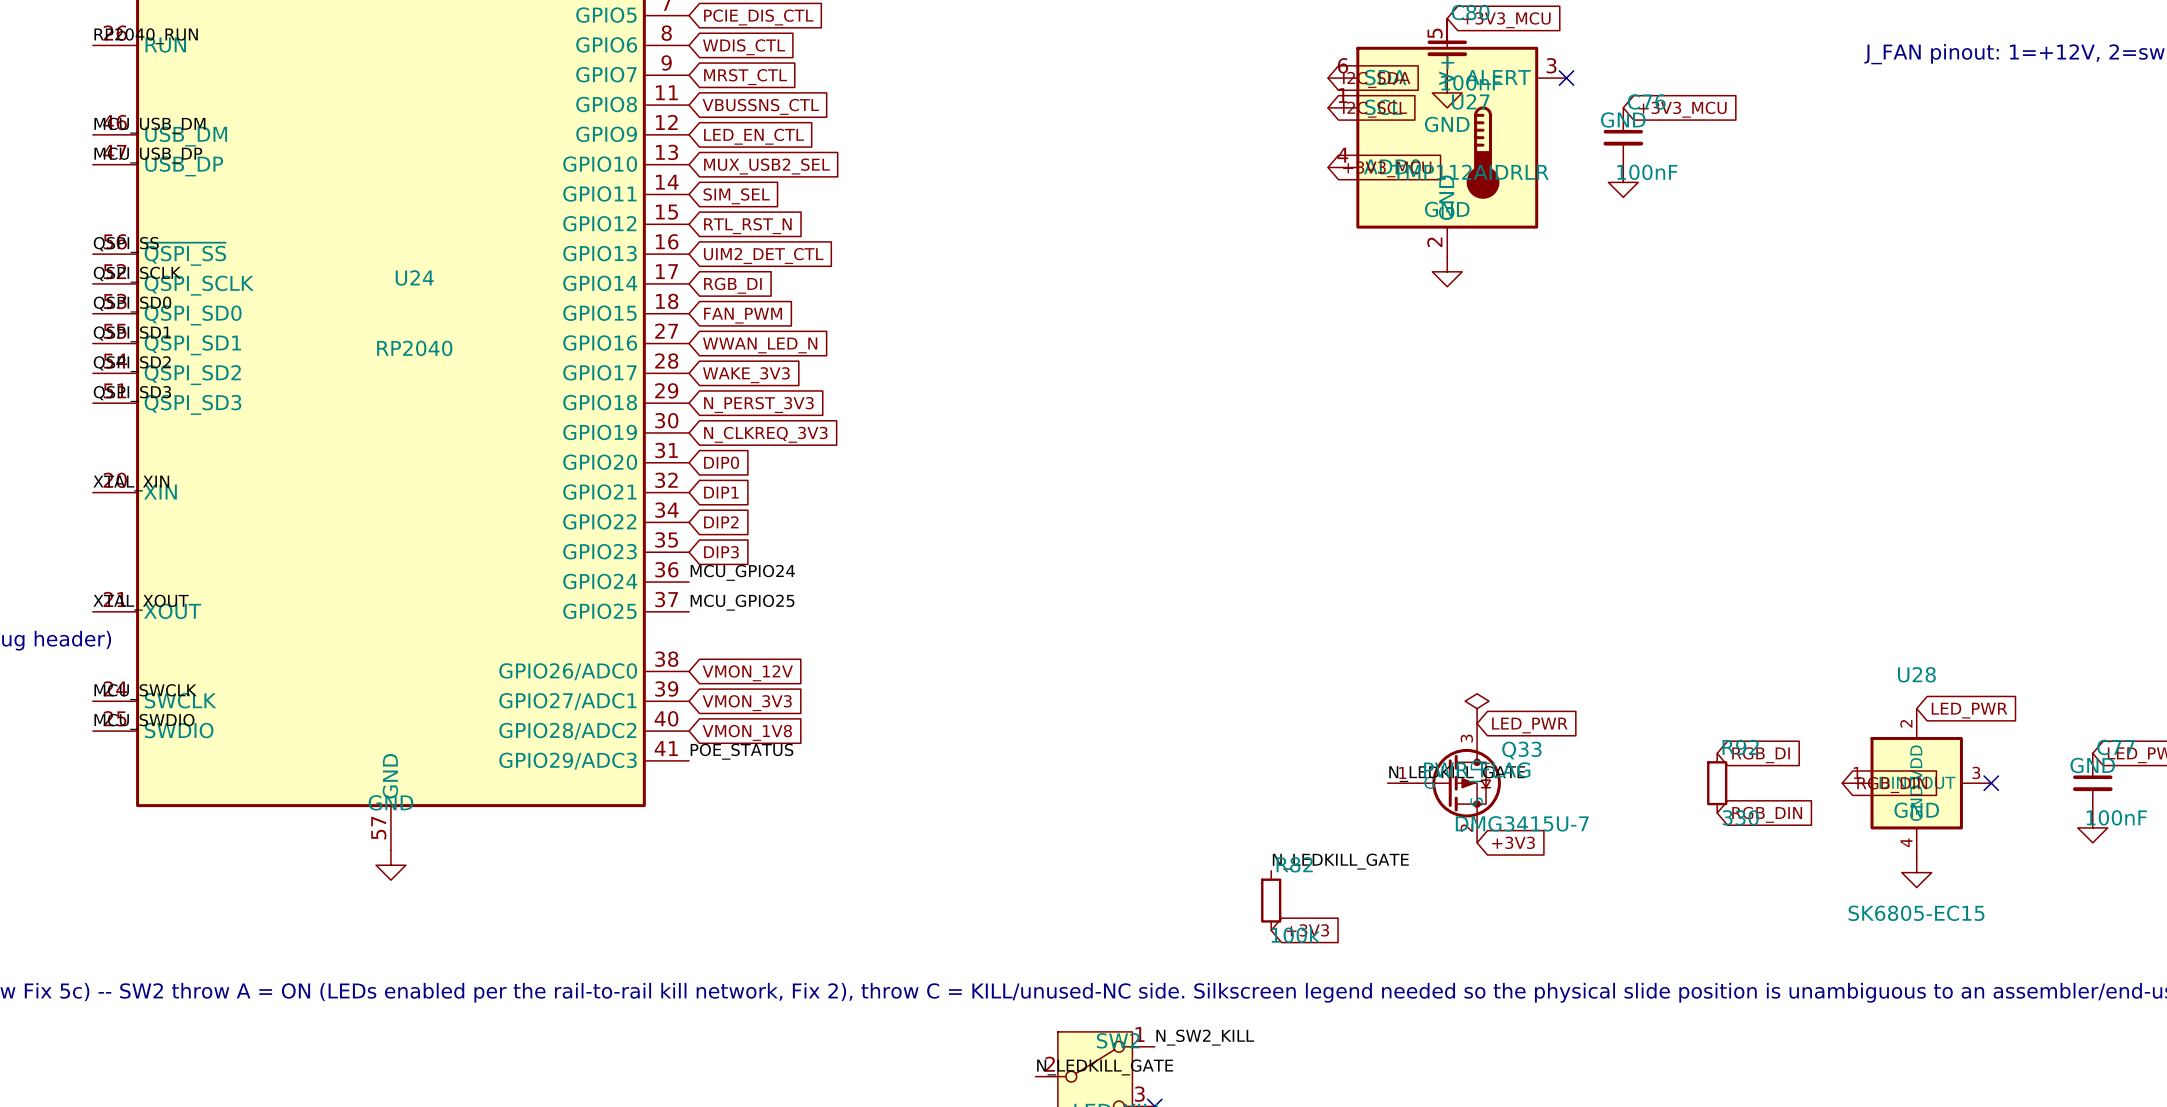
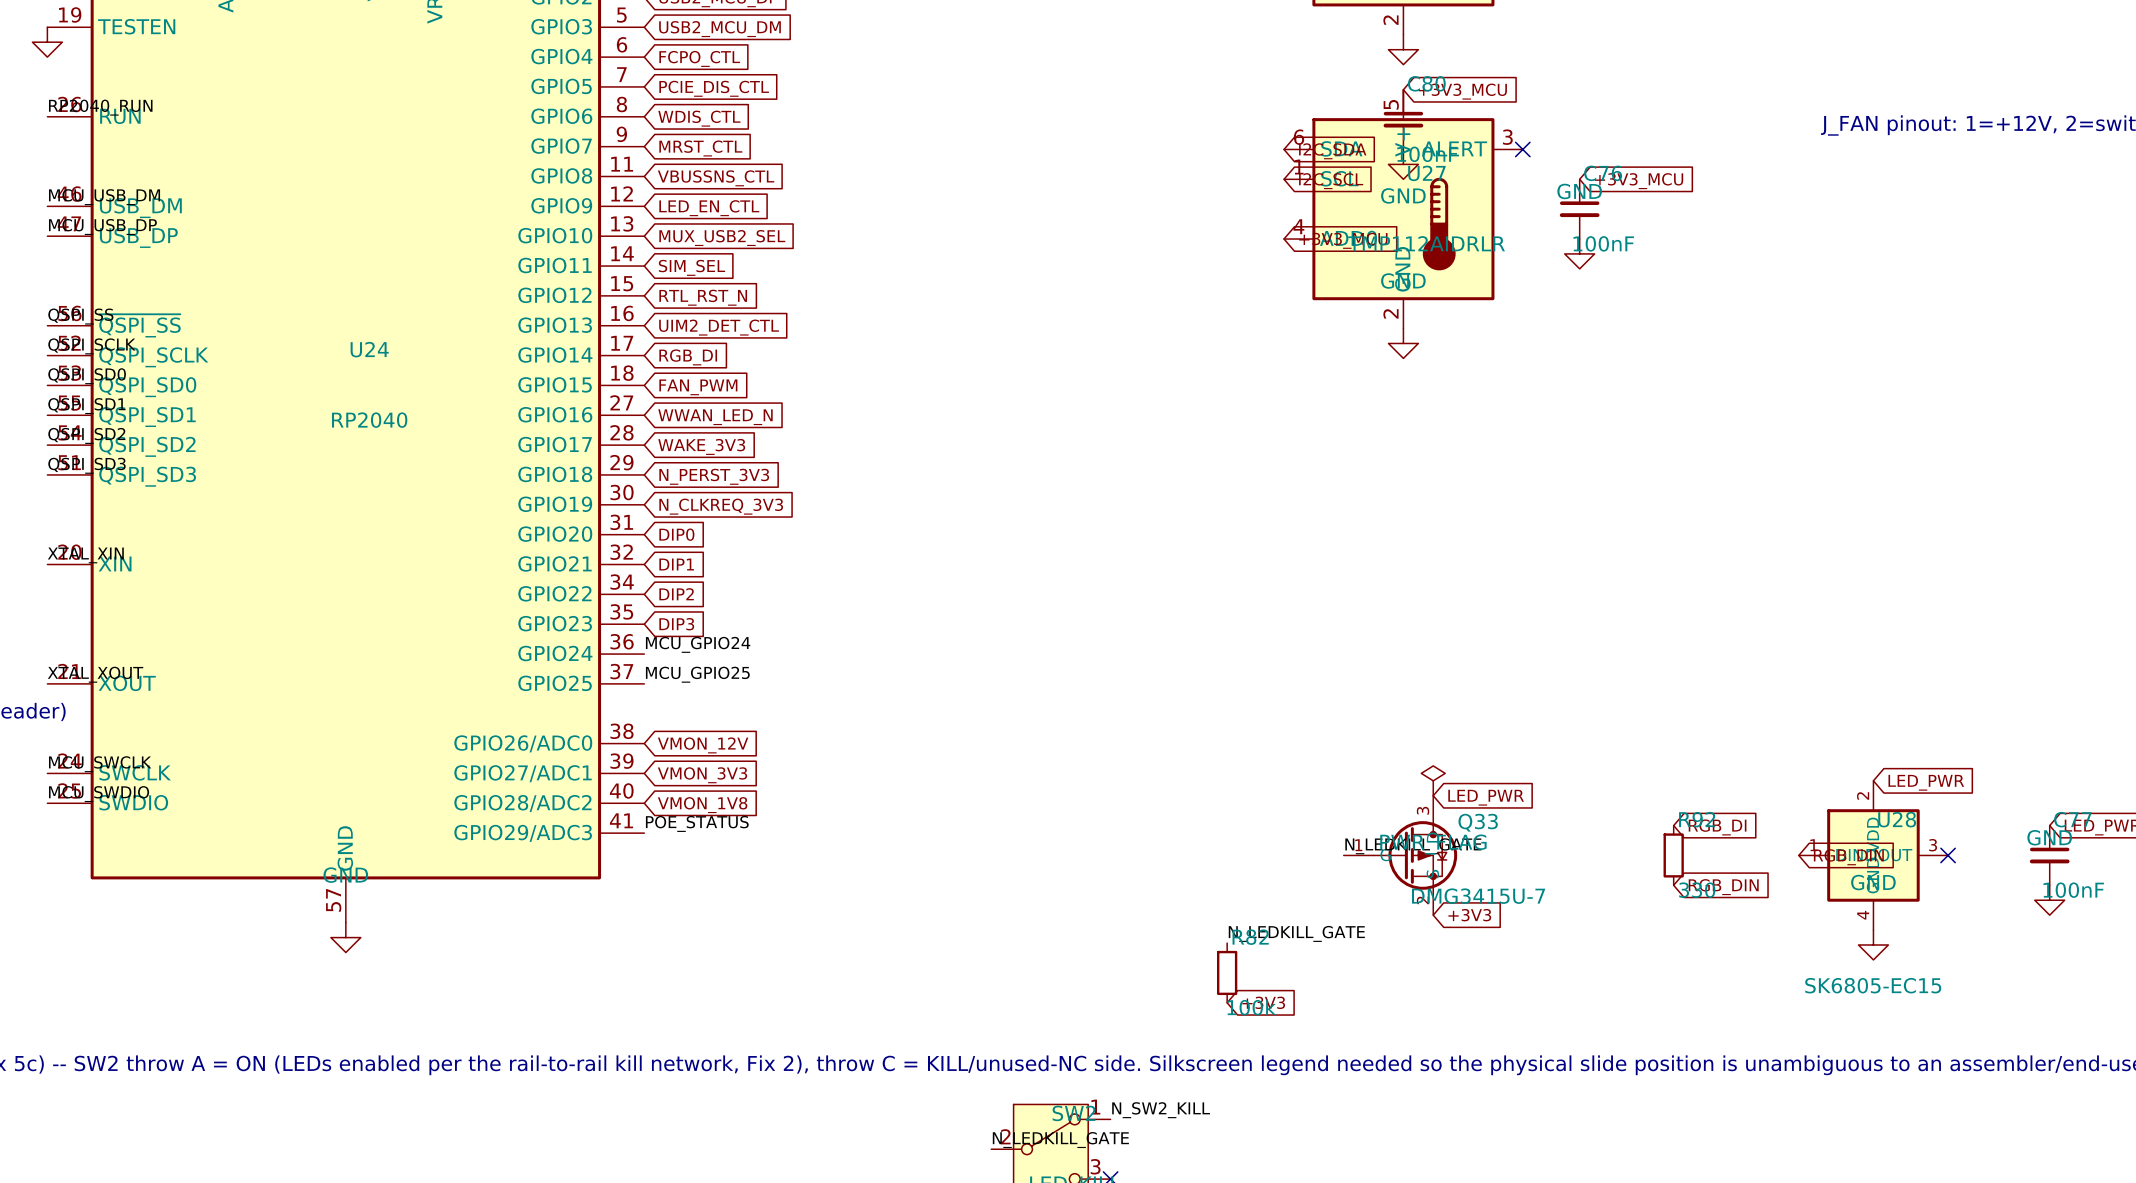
U28 name position: U28 (1916, 674) -> U28 (1897, 819)

